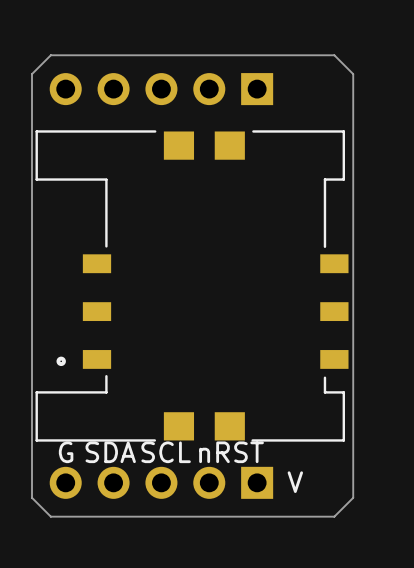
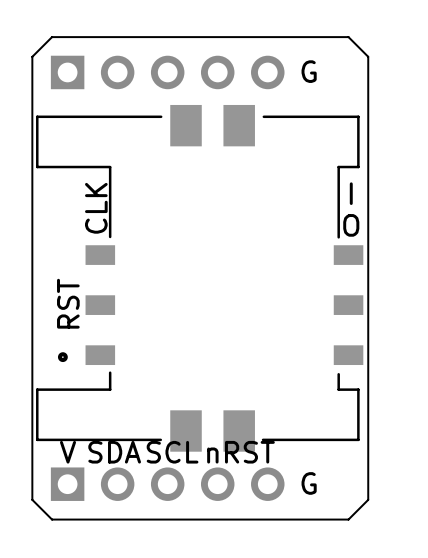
text: none -> G (309, 71)
part rotation: 0° (161, 89) -> 180° (167, 72)
part footprint: [35, 130, 349, 442] -> [36, 104, 364, 452]
text: none -> I (351, 193)
text: none -> CLK (96, 208)
text: none -> O (351, 225)
text: none -> RST (68, 303)
text: G (66, 452) -> V (68, 452)
part rotation: 0° (161, 482) -> 180° (167, 484)
text: V (295, 482) -> G (309, 483)

